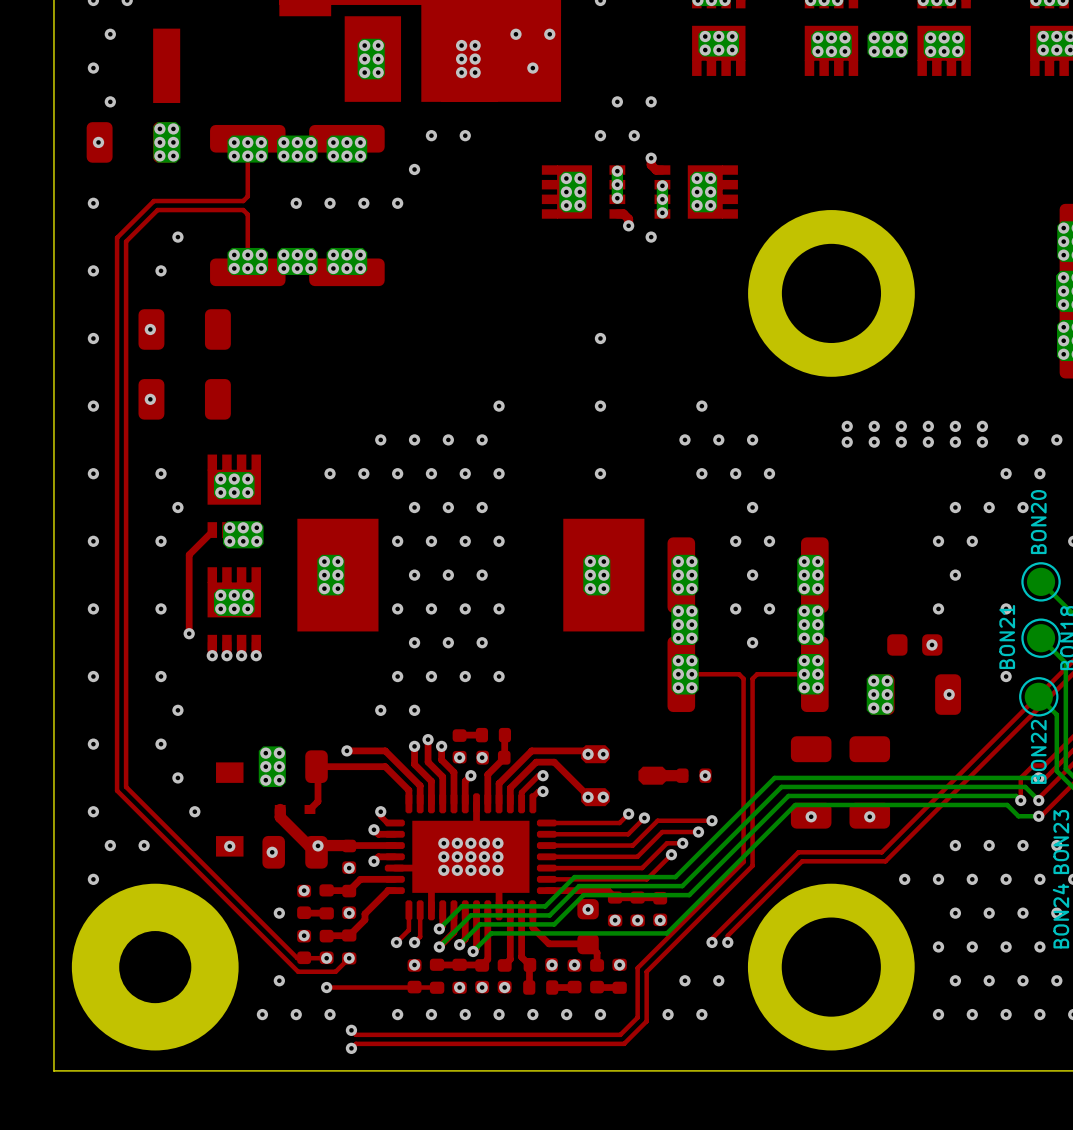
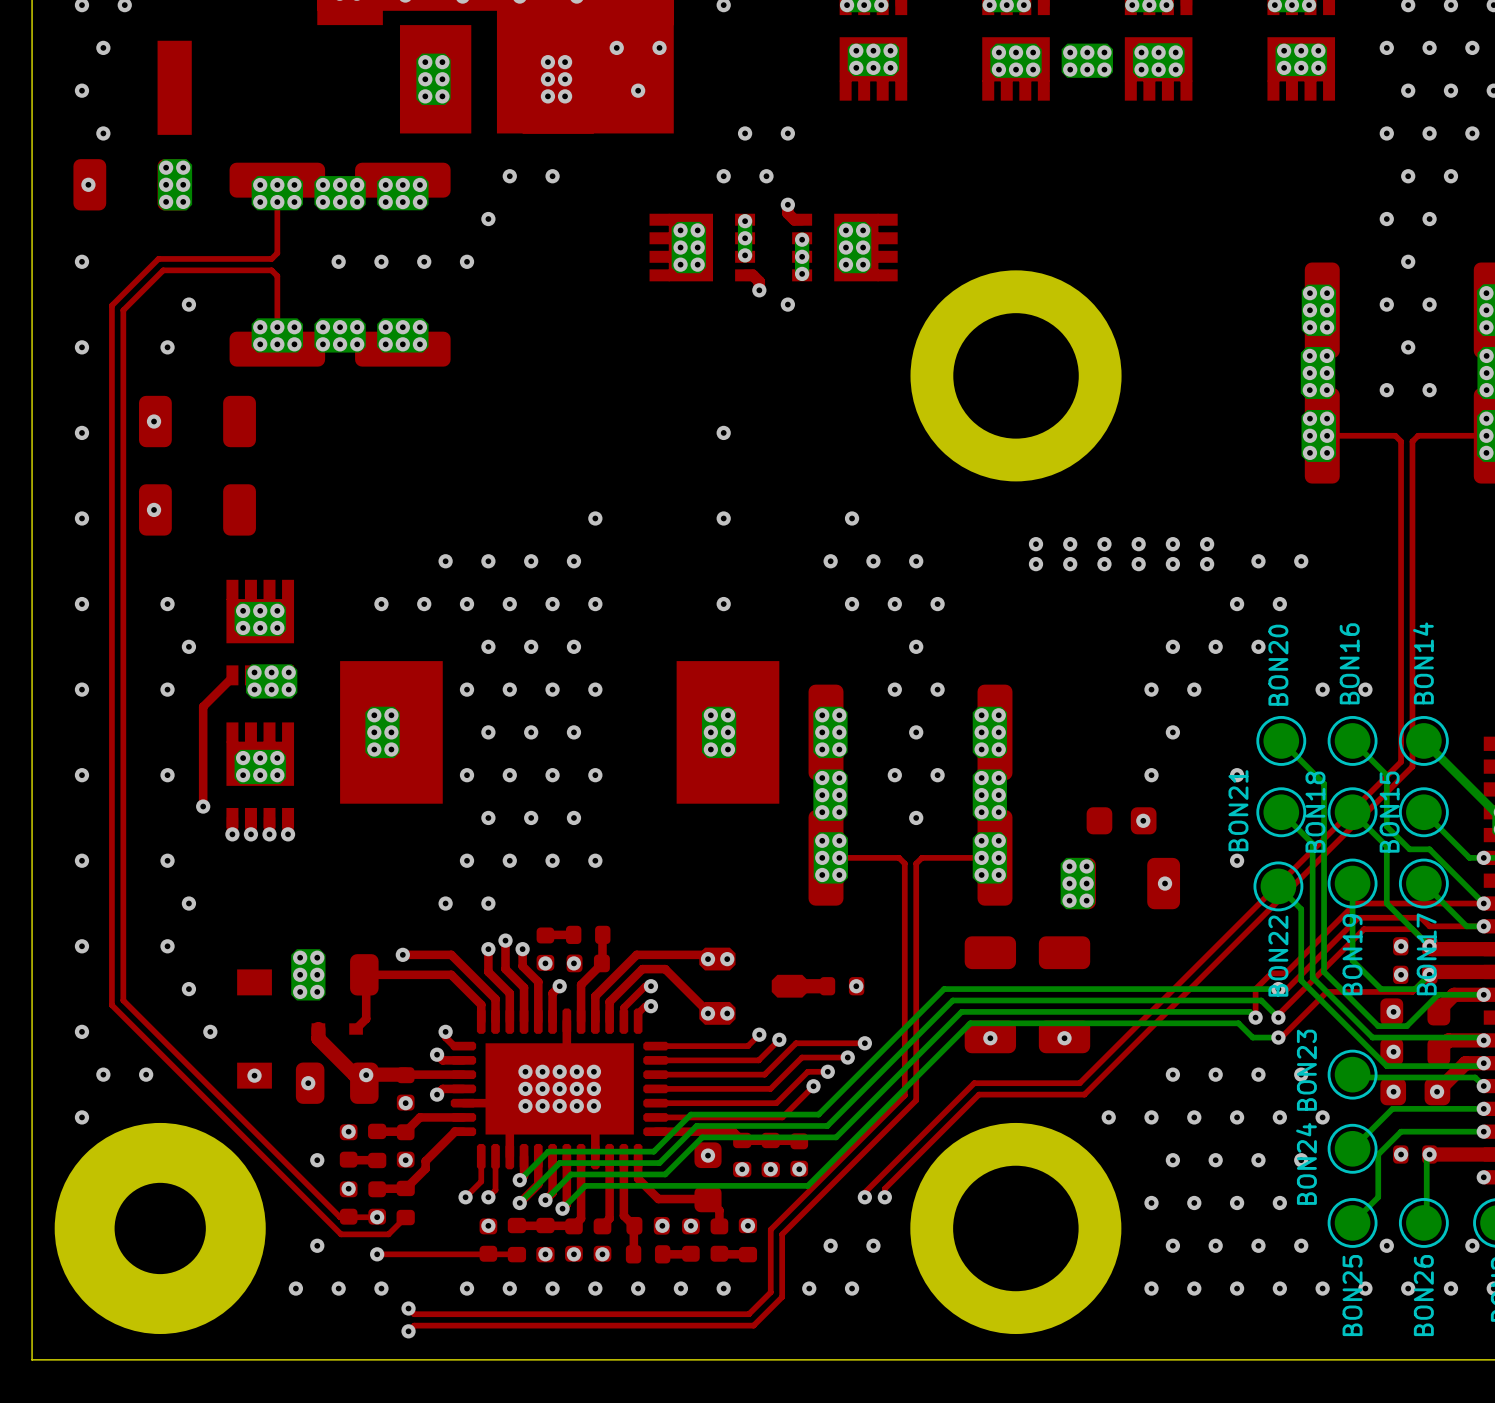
via: (349, 958) -> none

